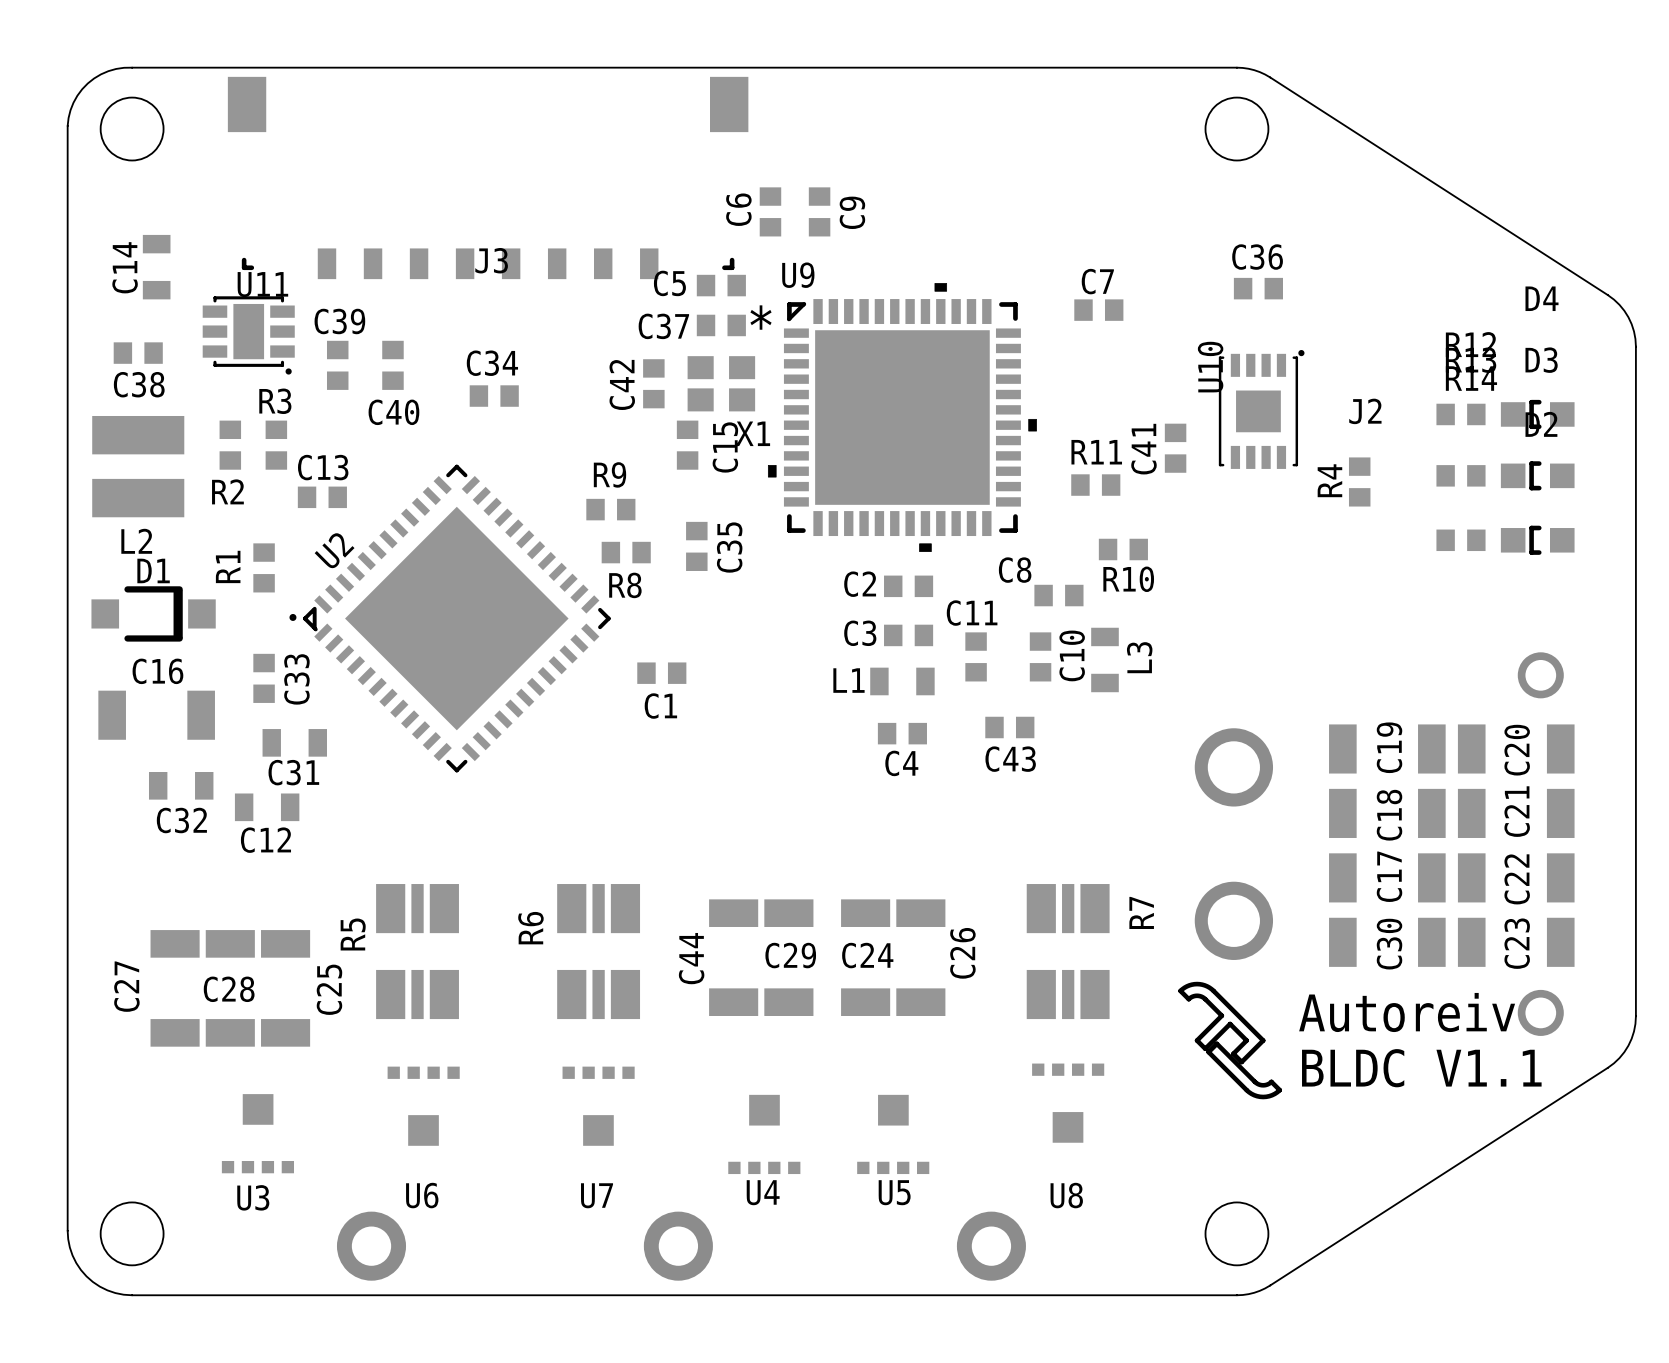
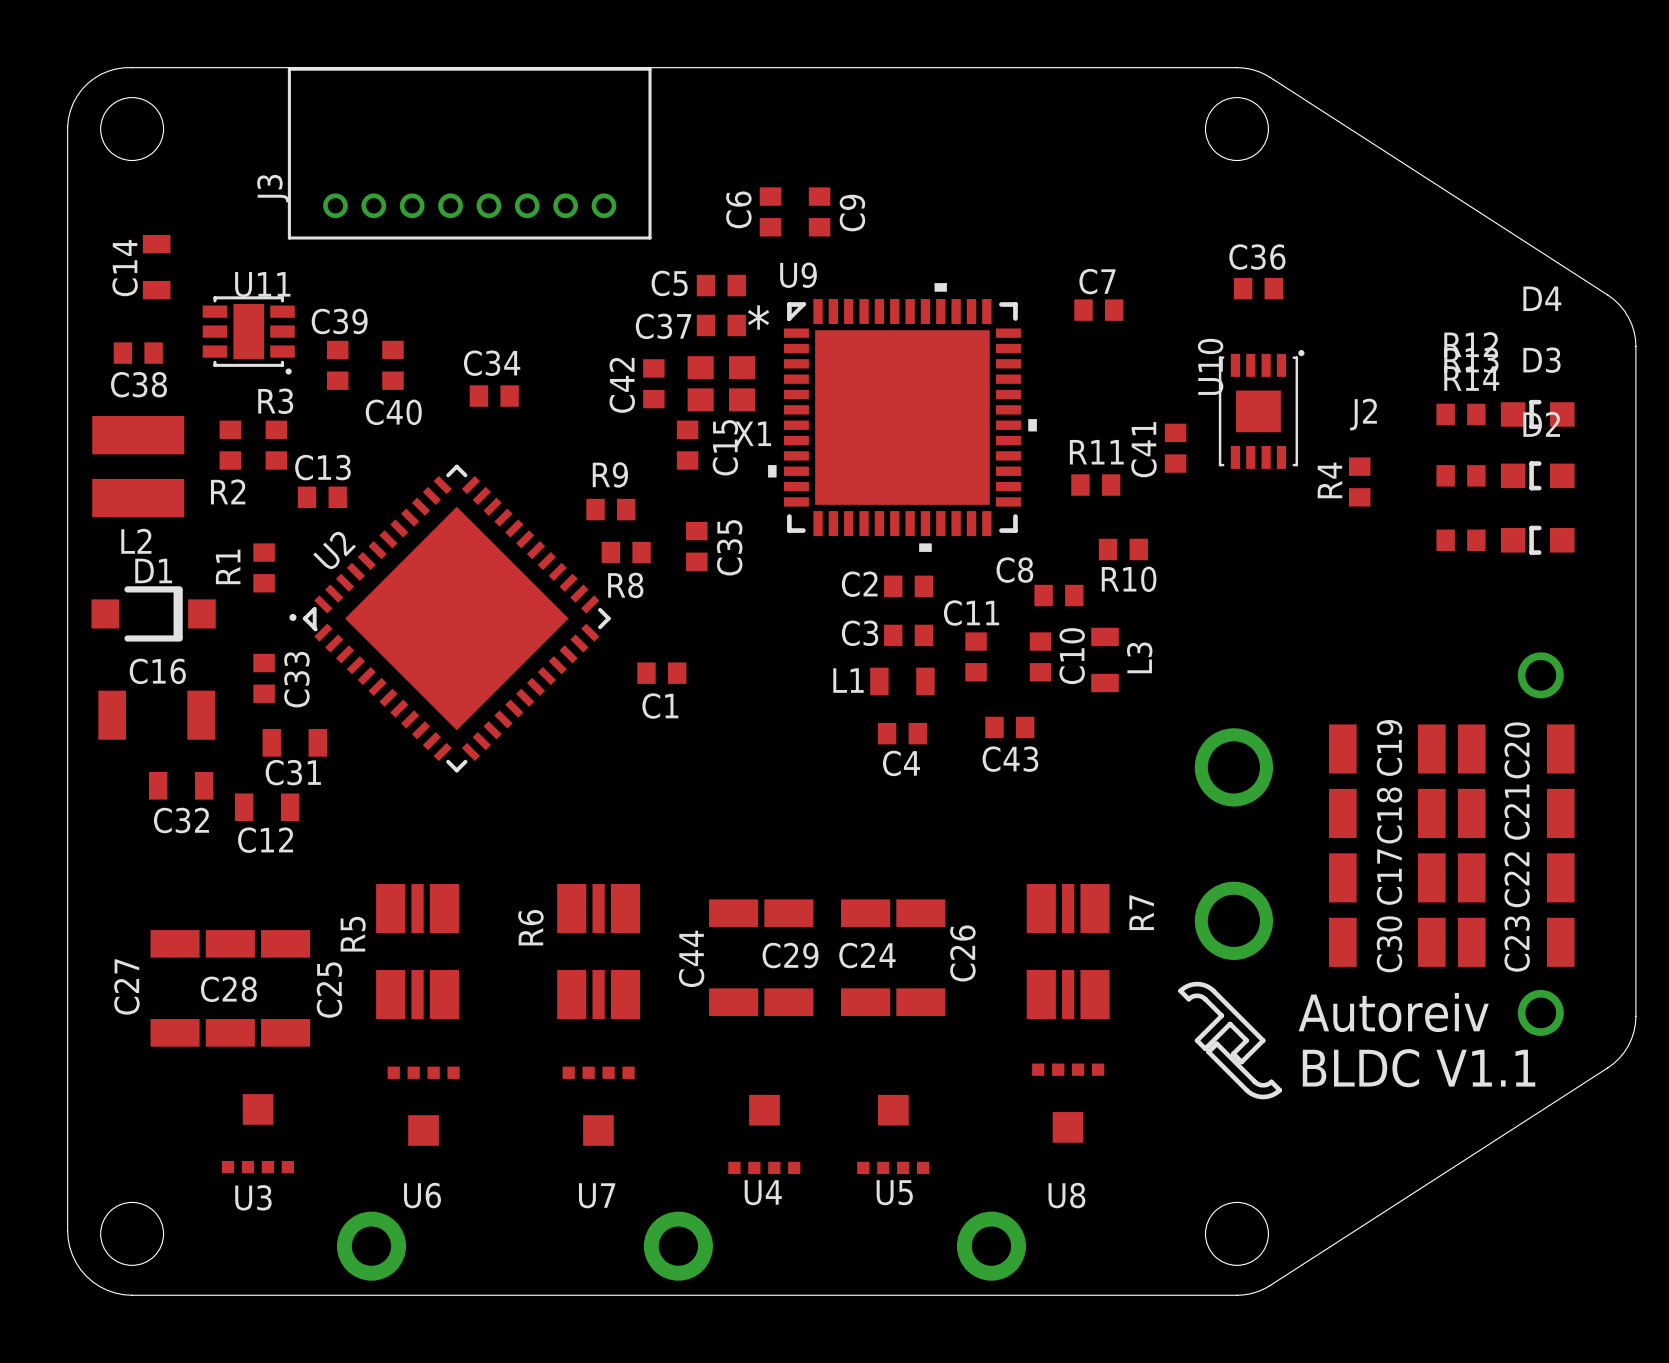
J3 footprint: [227, 76, 749, 280] -> [287, 67, 652, 240]
J3 name position: J3 (491, 260) -> J3 (273, 188)

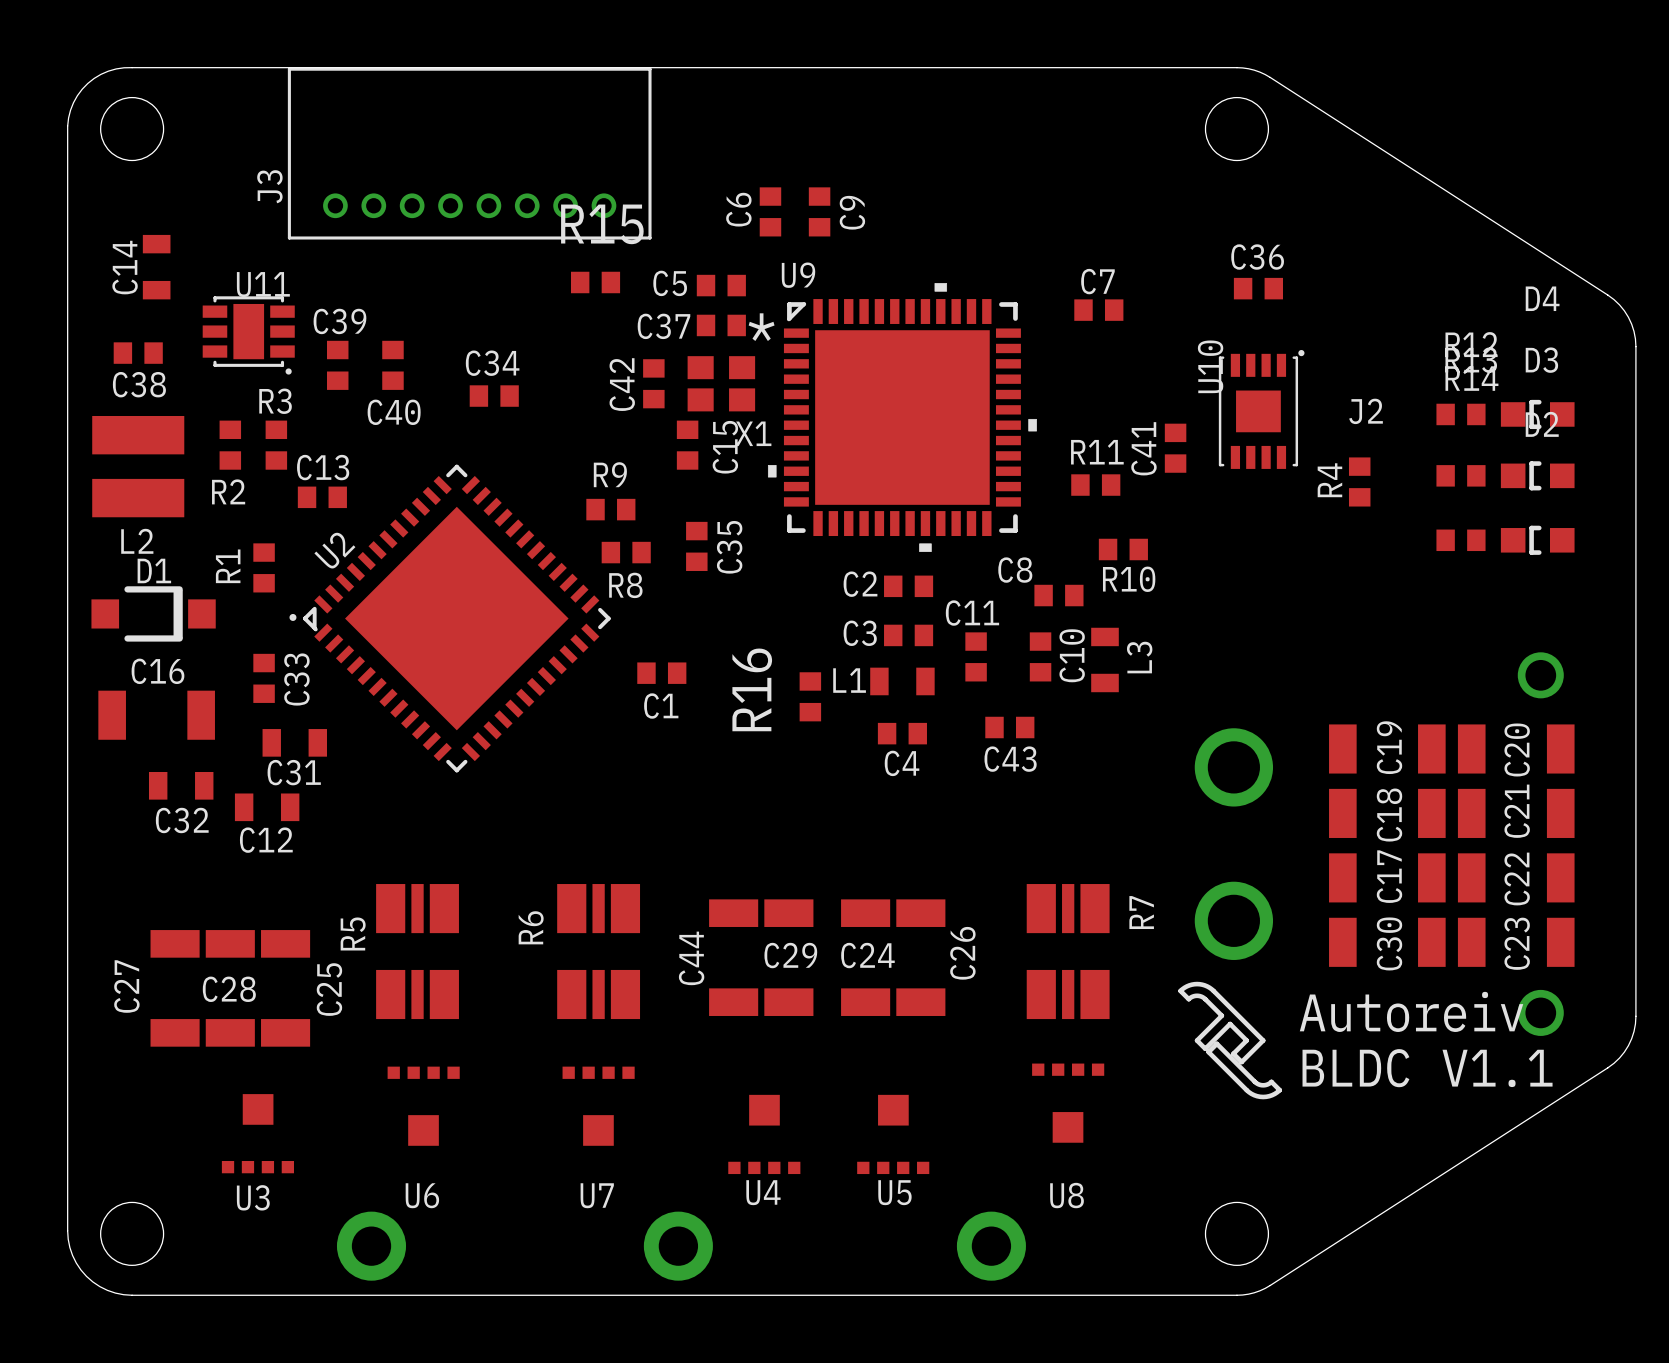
R15: none -> (595, 282)
R16: none -> (810, 696)

